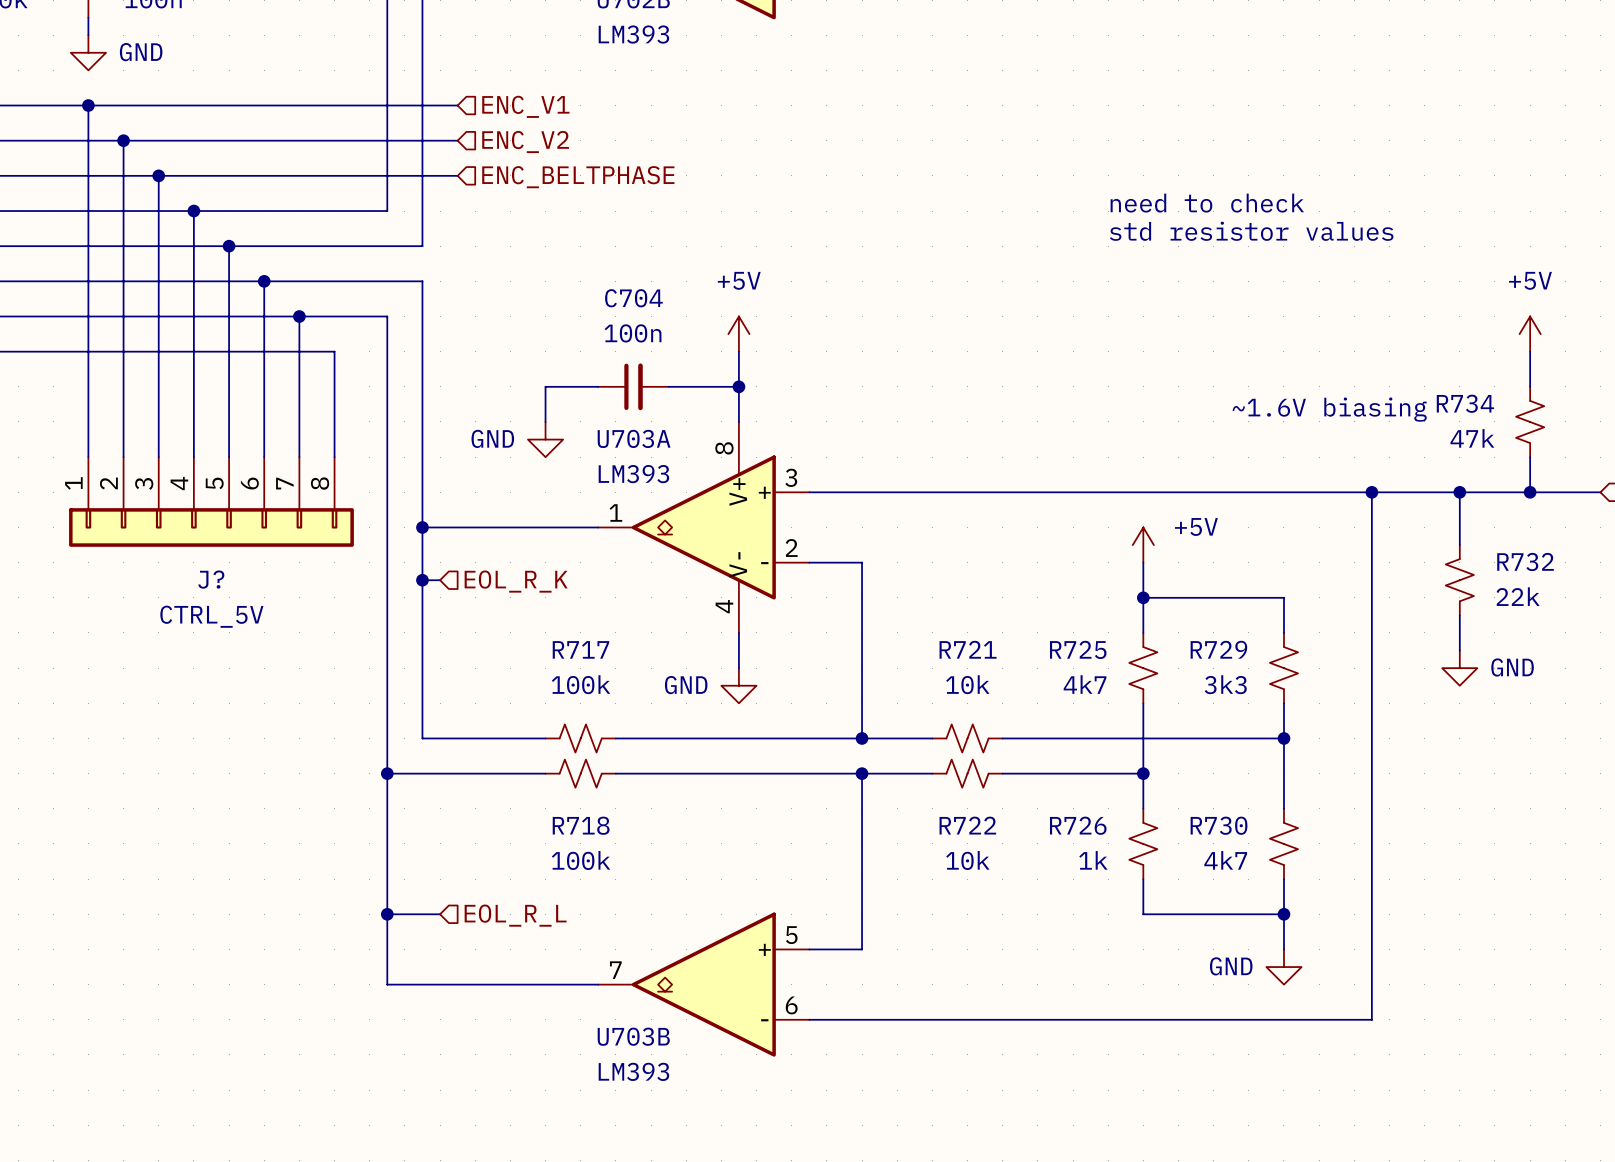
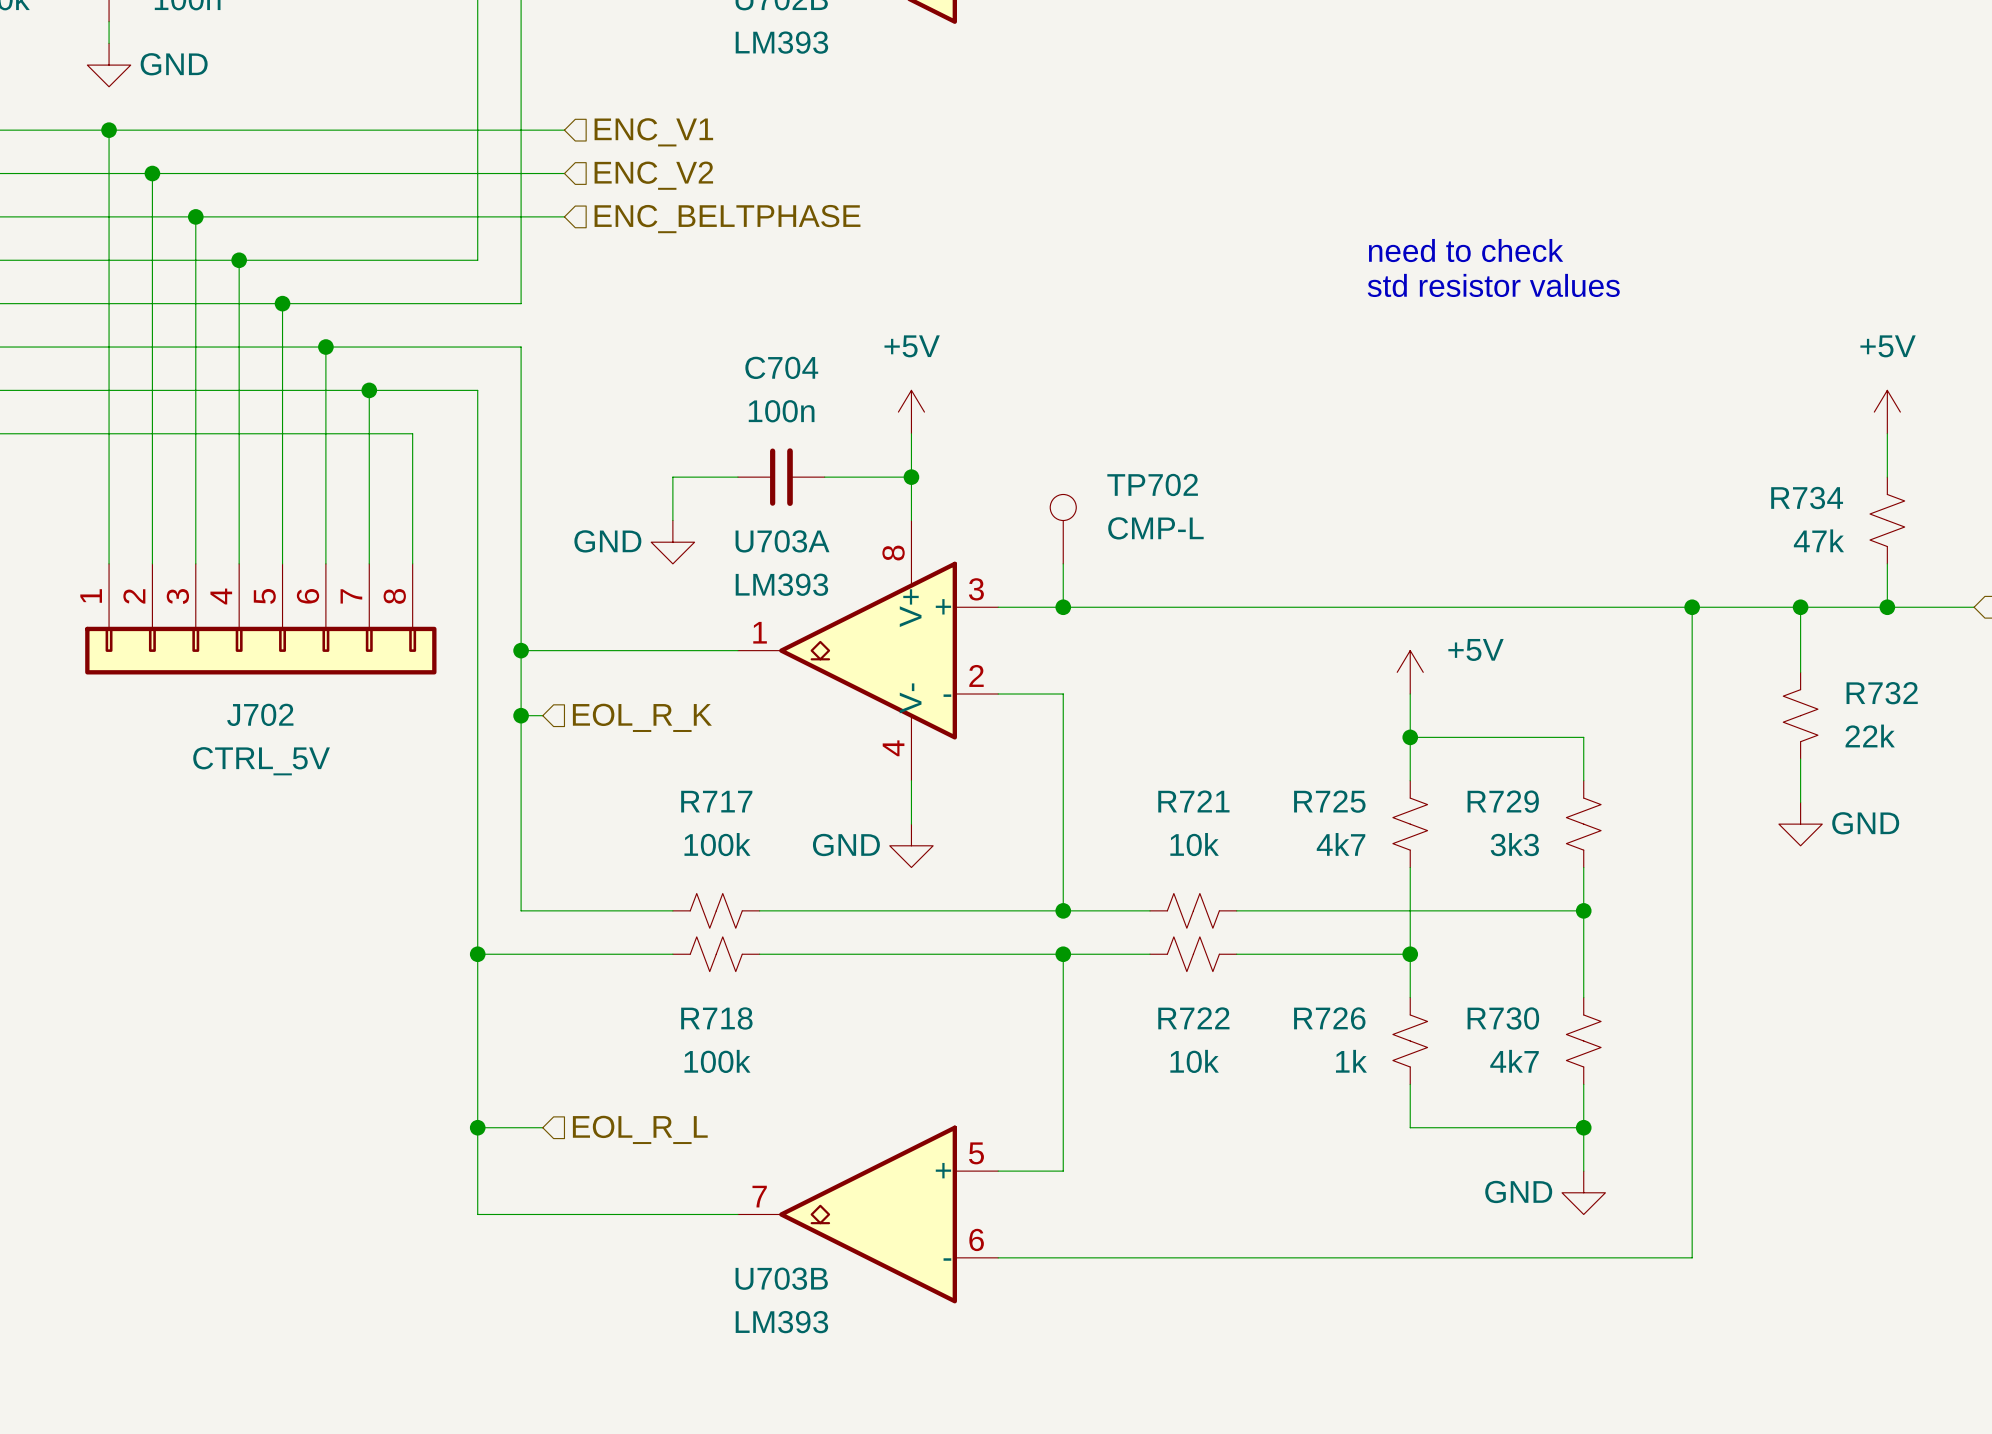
text: ~1.6V biasing (1329, 409) -> none
TP702: none -> CMP-L (1063, 529)
wire: none -> (1063, 563) (1063, 607)
junction: none -> (1063, 607)
J? name: J? (211, 579) -> J702 (260, 714)

